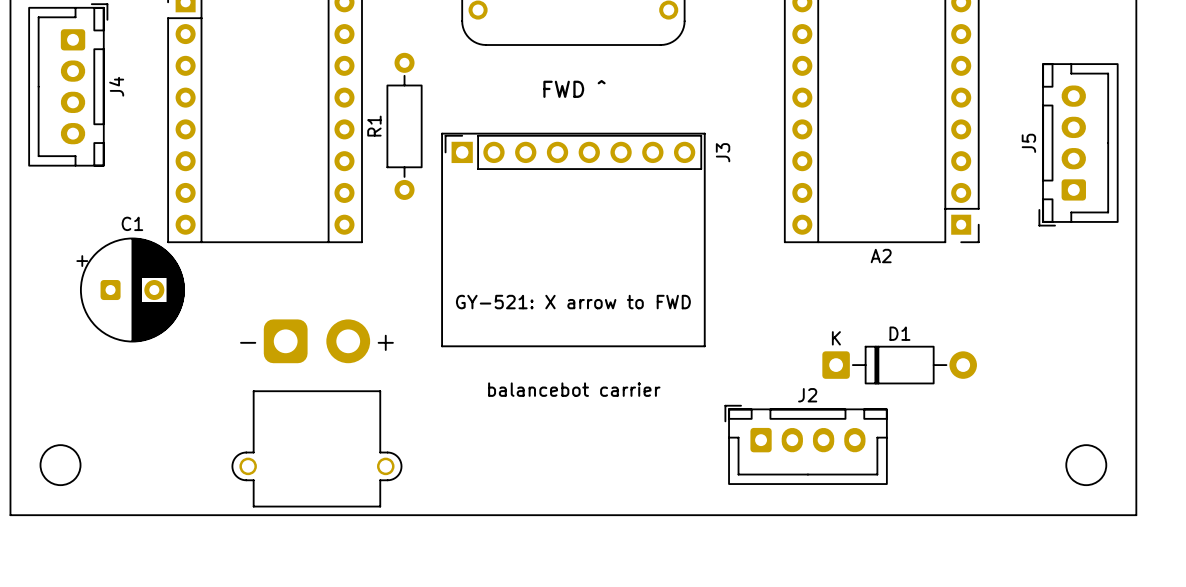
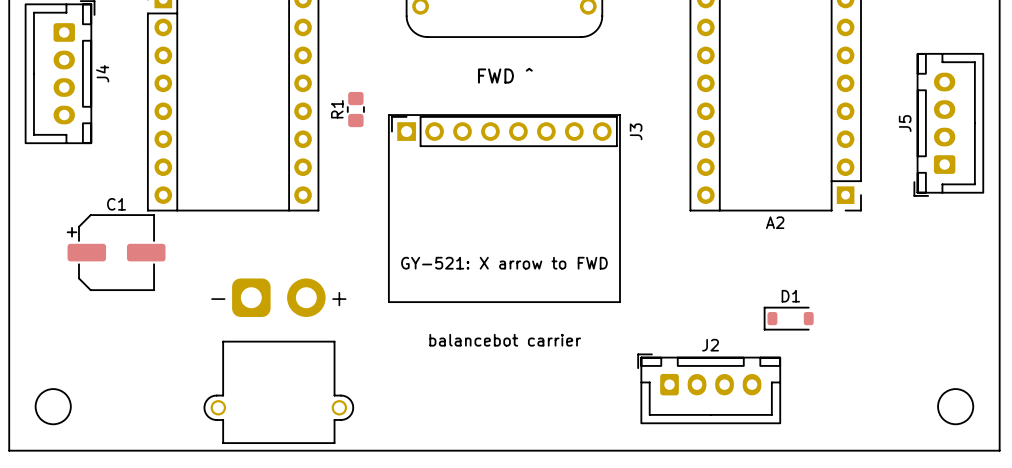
R1 footprint: [386, 52, 423, 200] -> [347, 91, 365, 128]
C1 footprint: [76, 237, 185, 343] -> [67, 214, 166, 291]
D1 footprint: [822, 345, 977, 385] -> [763, 306, 814, 331]

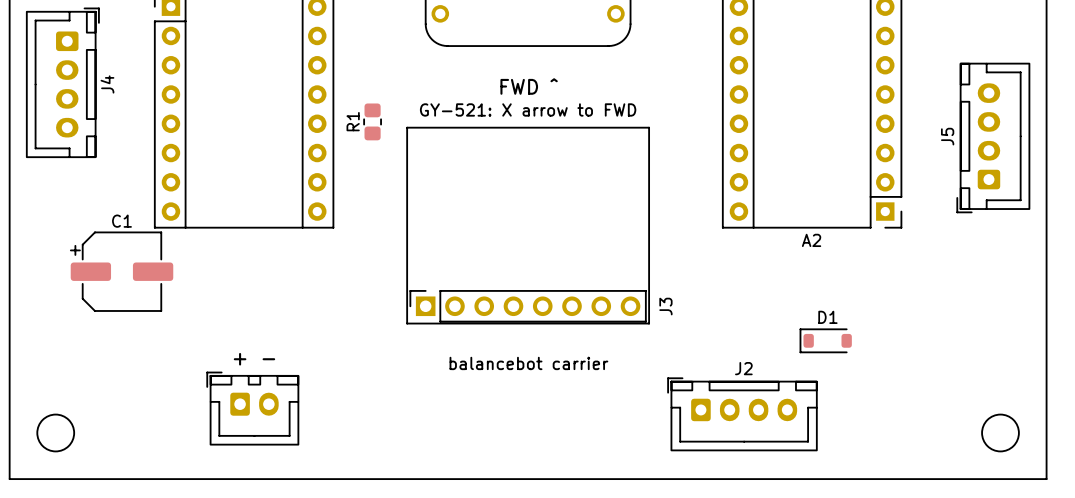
J3 position: (504, 131) -> (528, 306)
text position: GY-521: X arrow to FWD (504, 263) -> GY-521: X arrow to FWD (528, 109)
text: none -> + (240, 359)
text: none -> - (268, 359)
part: (278, 361) -> none
part: none -> (252, 408)

